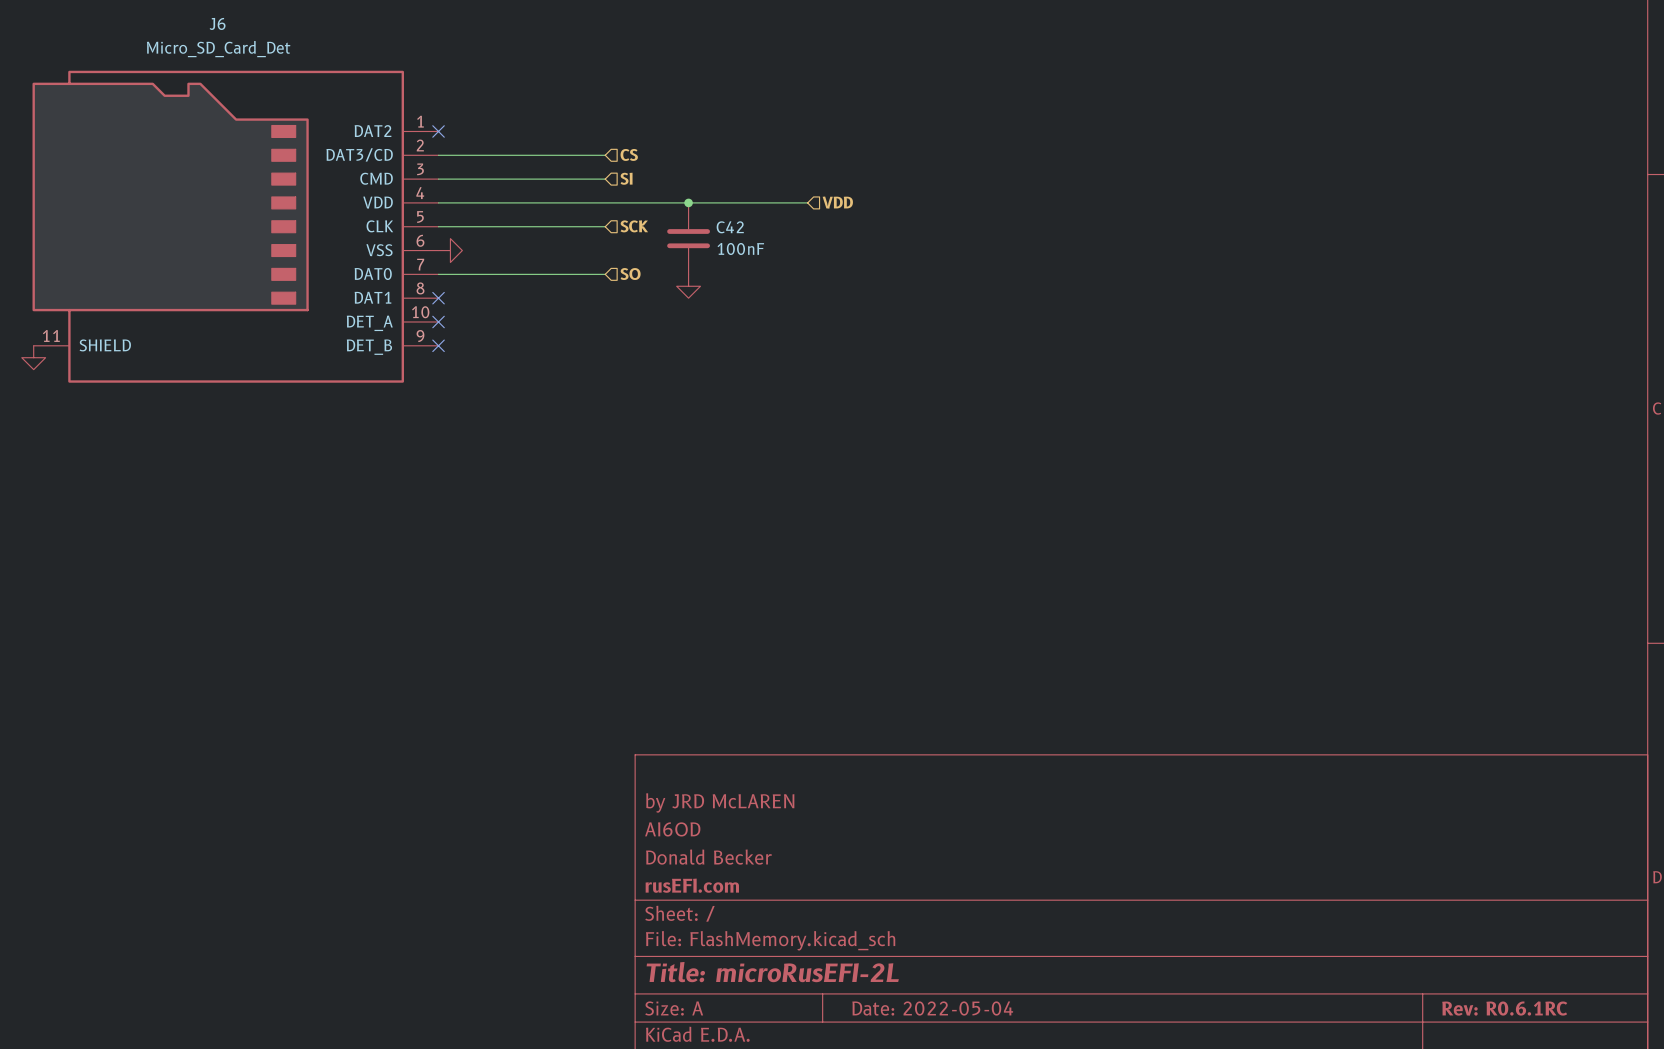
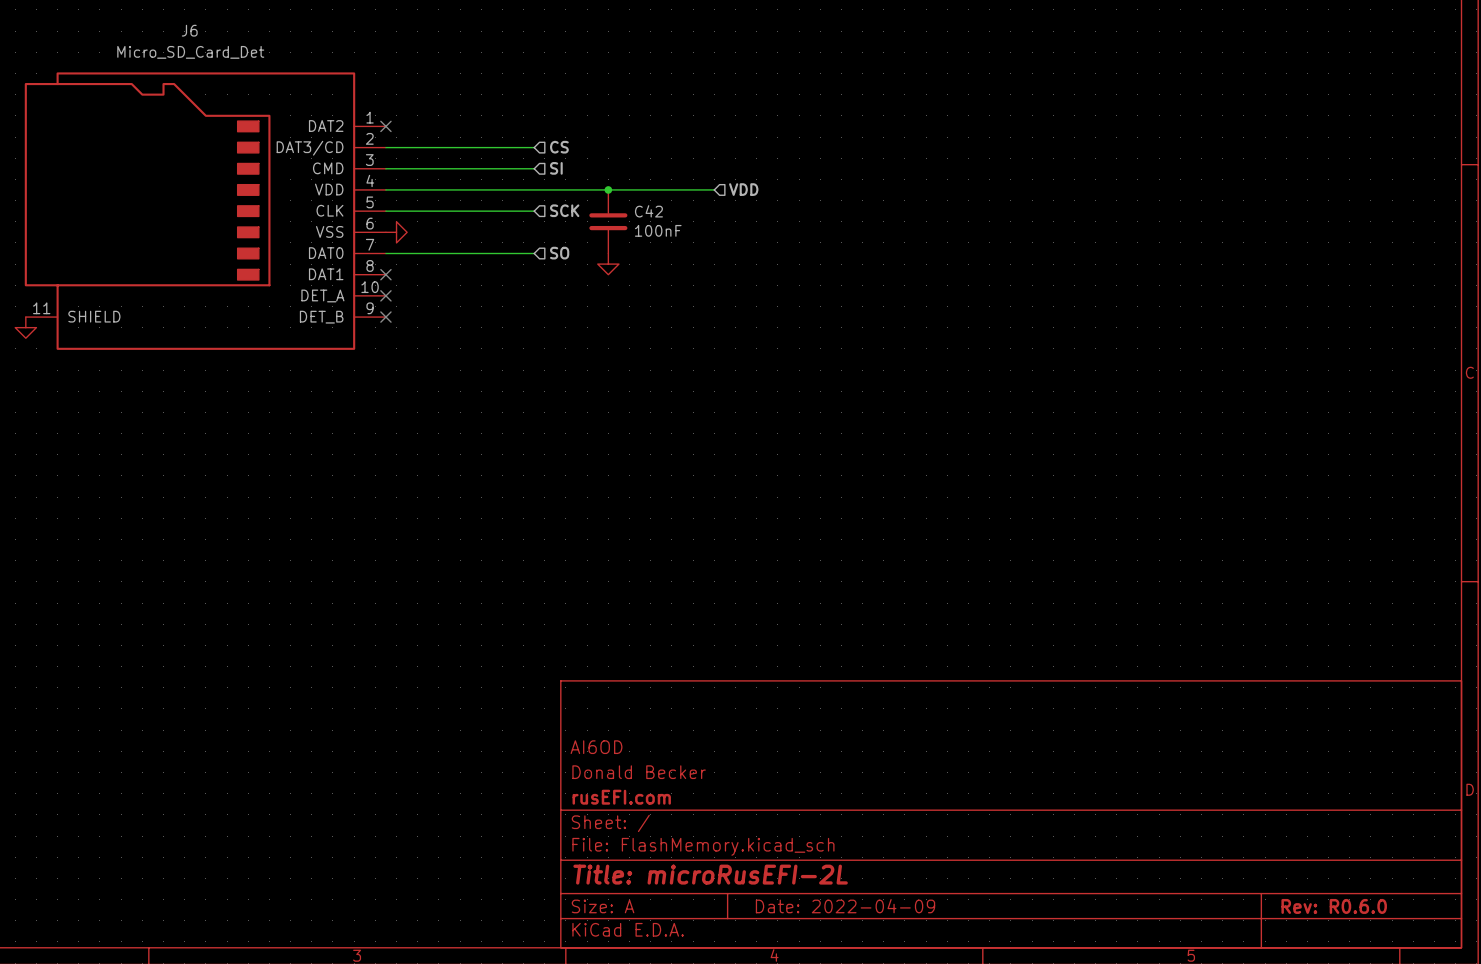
title block: by JRD McLAREN (720, 802) -> none
title block: Date: 2022-05-04 (932, 1008) -> Date: 2022-04-09 (845, 906)
title block: Rev: R0.6.1RC (1504, 1008) -> Rev: R0.6.0 (1334, 906)

